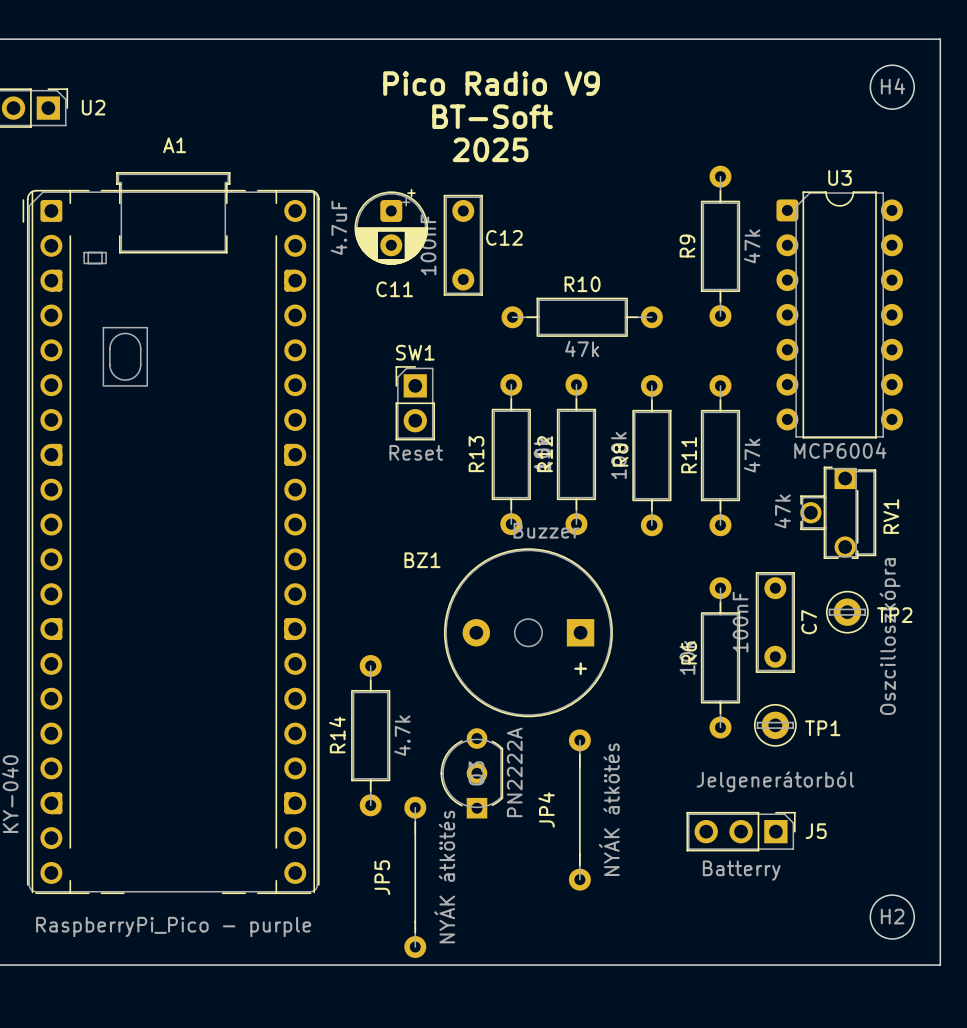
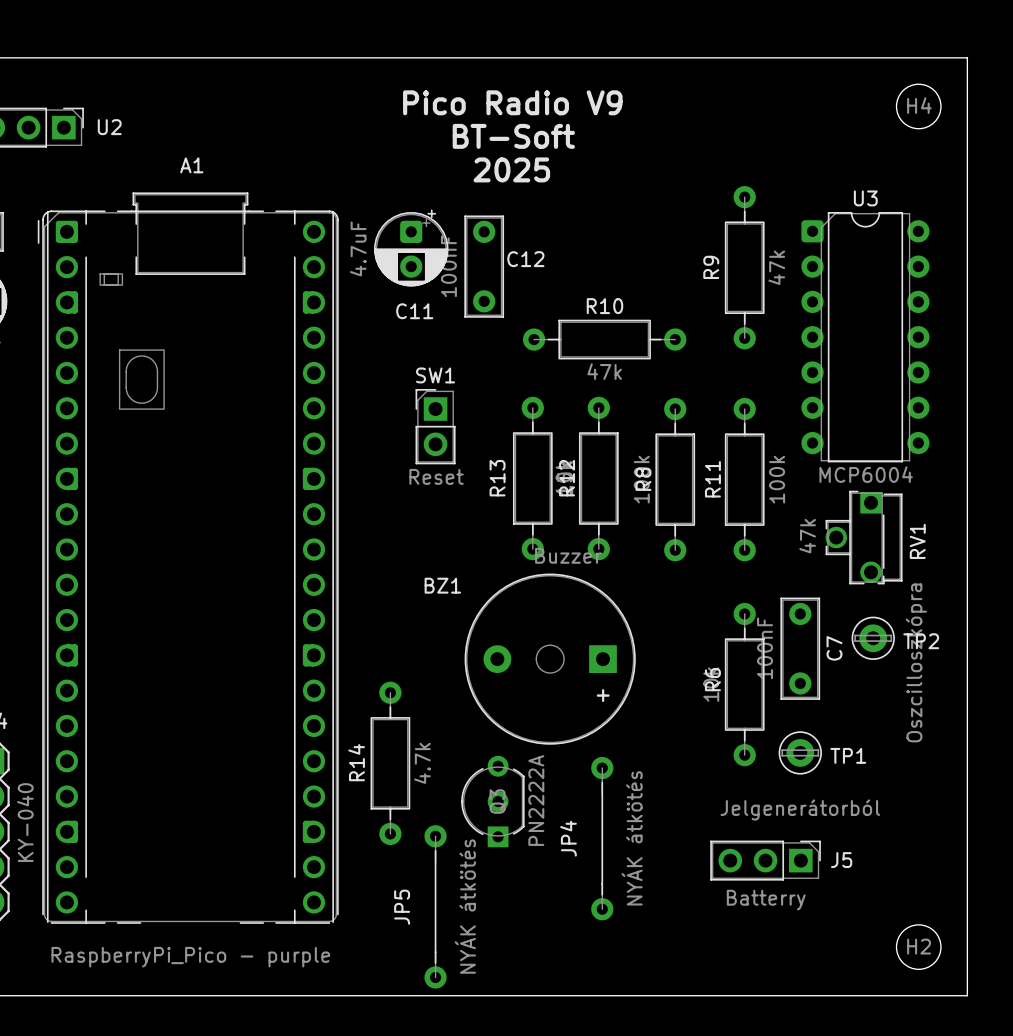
R11 value: 47k (752, 455) -> 100k (777, 479)

